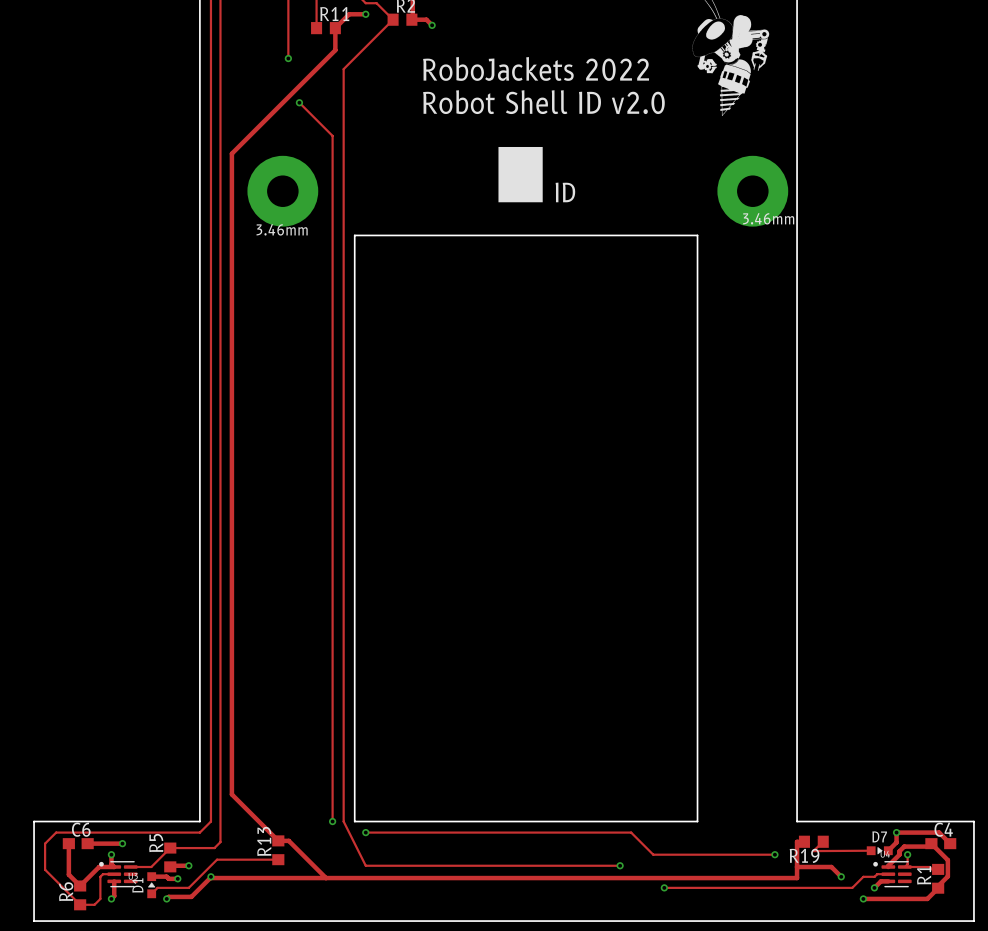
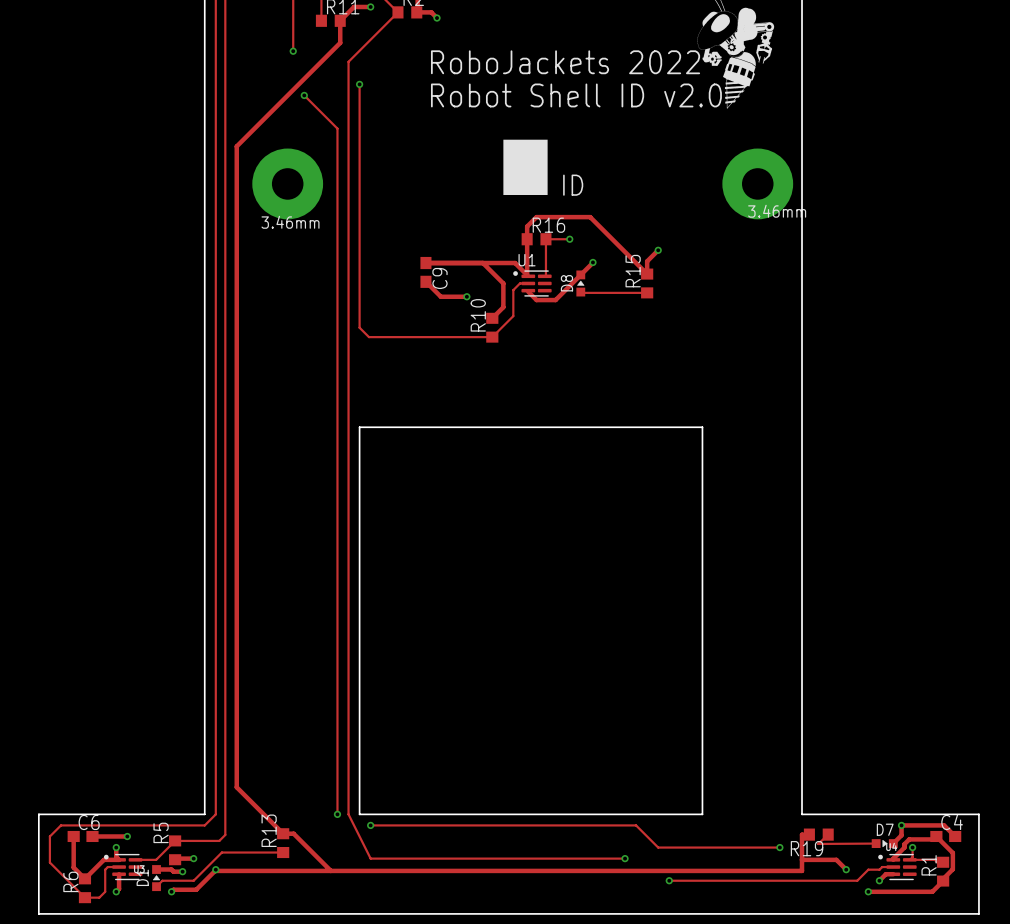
track: none -> (359, 84) (359, 327) (368, 337) (492, 337) (513, 316) (513, 290) (519, 283) (528, 283)
via: none -> (359, 84)
R16: none -> (536, 239)
track: none -> (569, 239) (545, 239) (544, 276)
via: none -> (569, 239)
track: none -> (658, 250) (647, 261) (647, 274) (590, 217) (536, 217) (527, 226) (527, 275)
via: none -> (658, 250)
track: none -> (592, 262) (555, 300) (536, 300) (528, 290)
via: none -> (592, 262)
track: none -> (425, 263) (515, 263) (527, 275)
track: none -> (482, 263) (503, 283) (503, 307) (492, 318)
C9: none -> (425, 272)
track: none -> (425, 281) (440, 296) (466, 296)
U1: none -> (532, 283)
D8: none -> (580, 283)
R15: none -> (647, 283)
track: none -> (580, 292) (647, 292)
via: none -> (466, 296)
R10: none -> (492, 327)
board edge: (354, 434) (354, 235) (697, 235) (697, 434) -> (359, 427) (702, 427)

